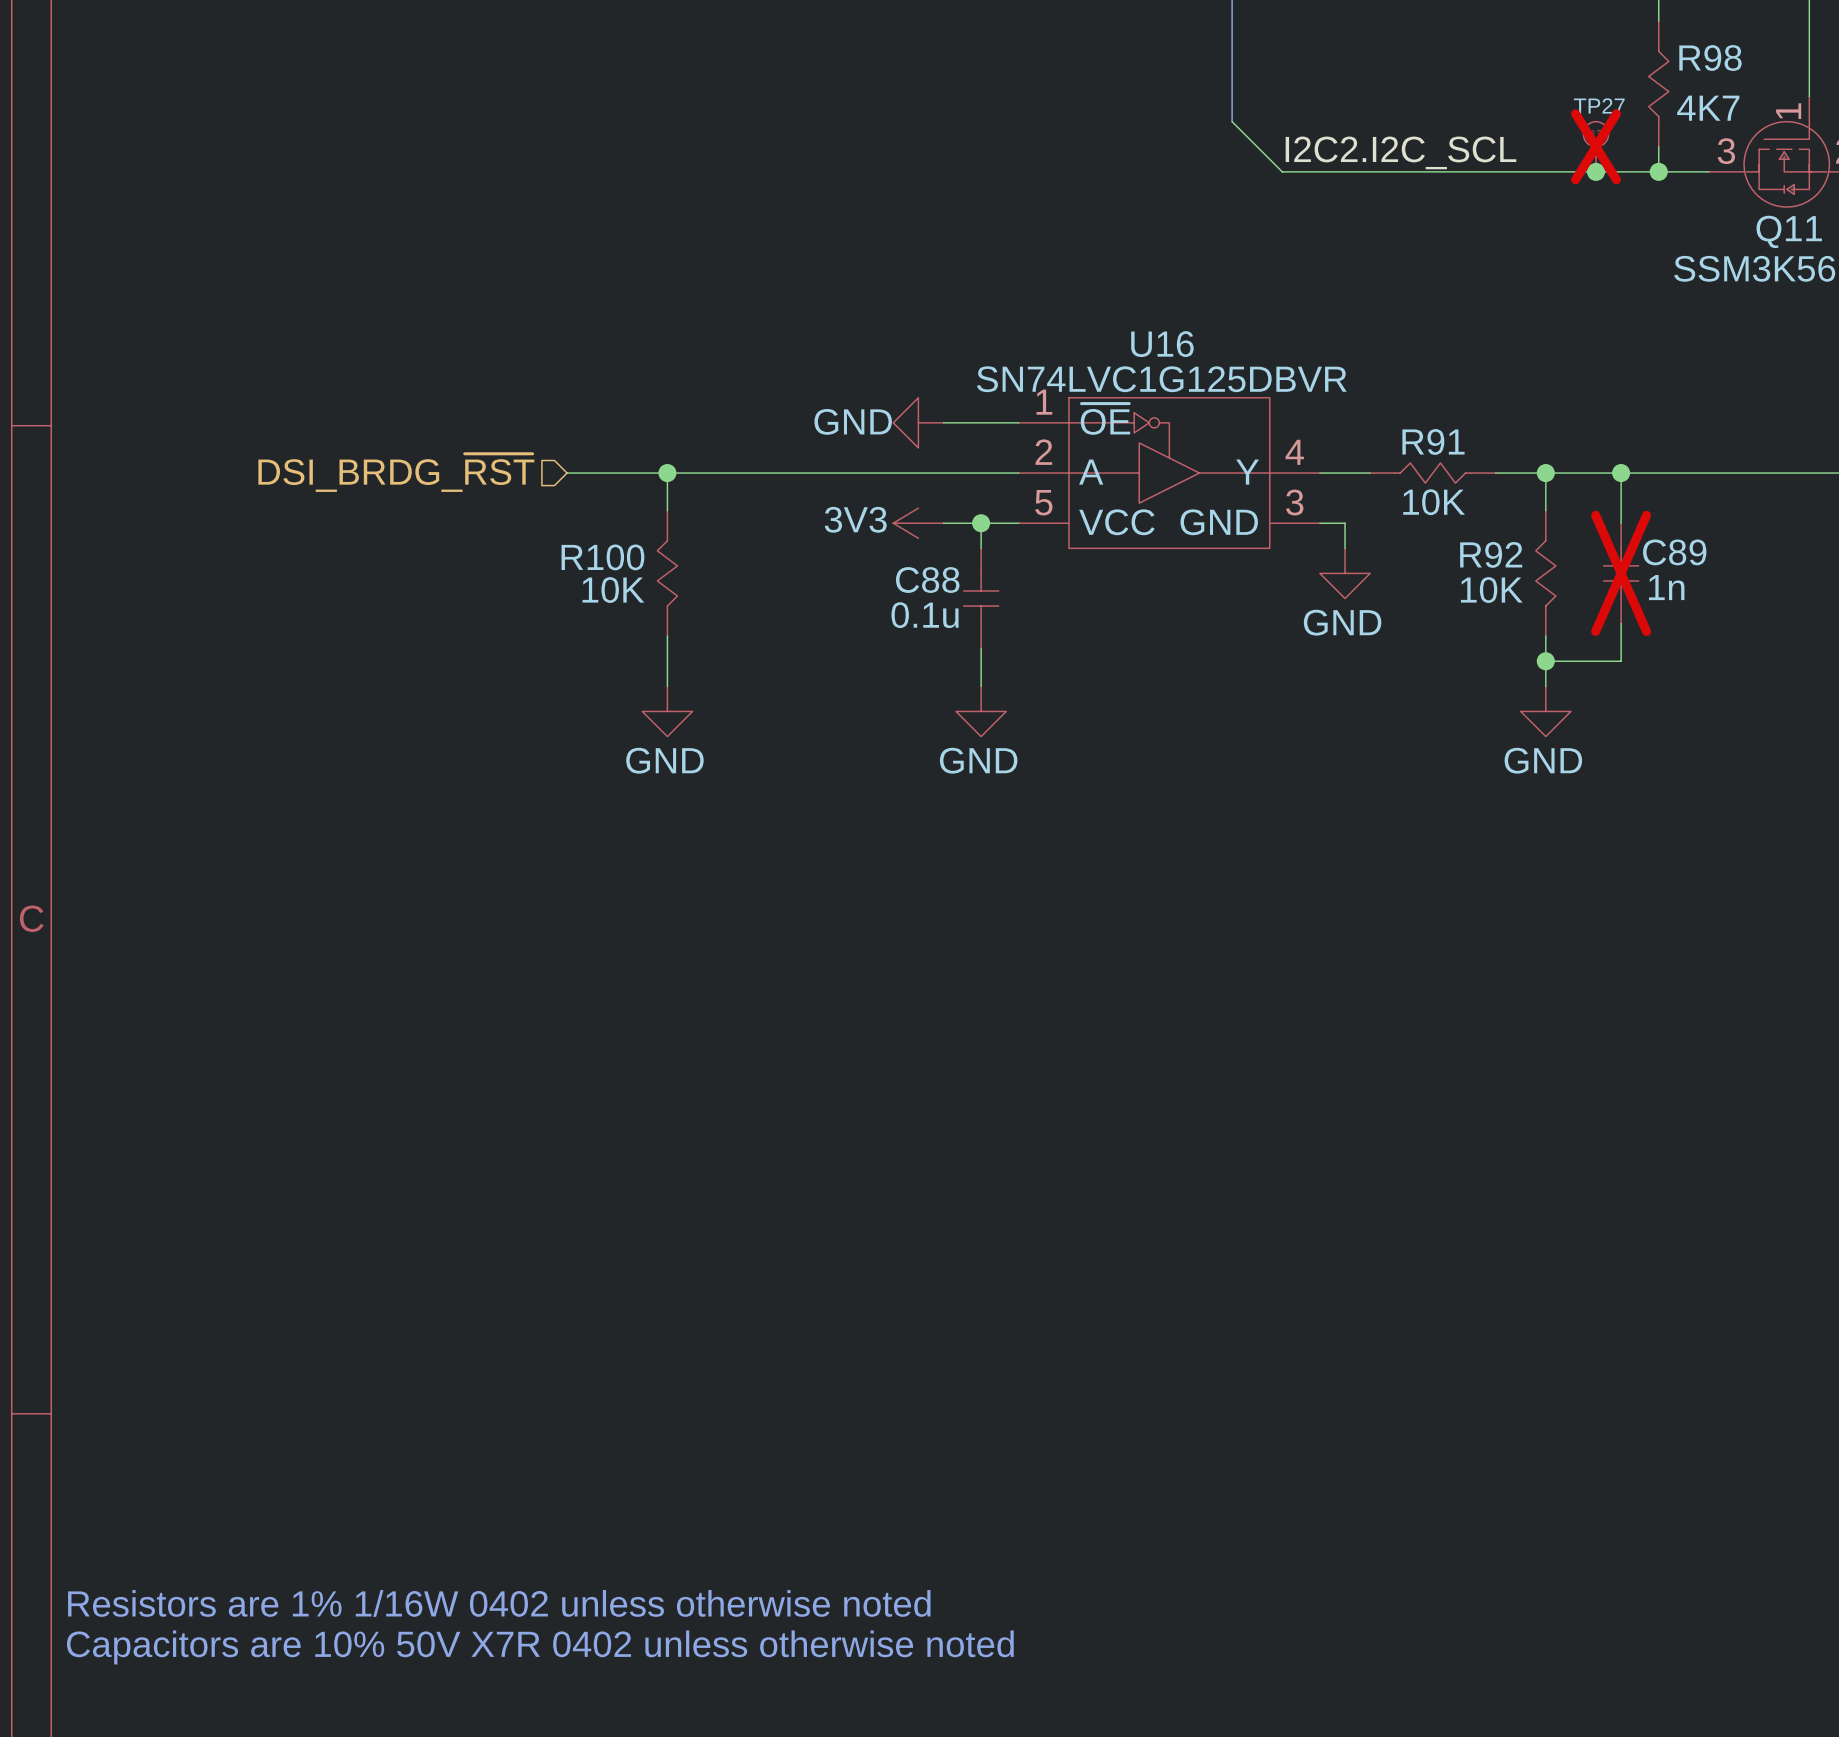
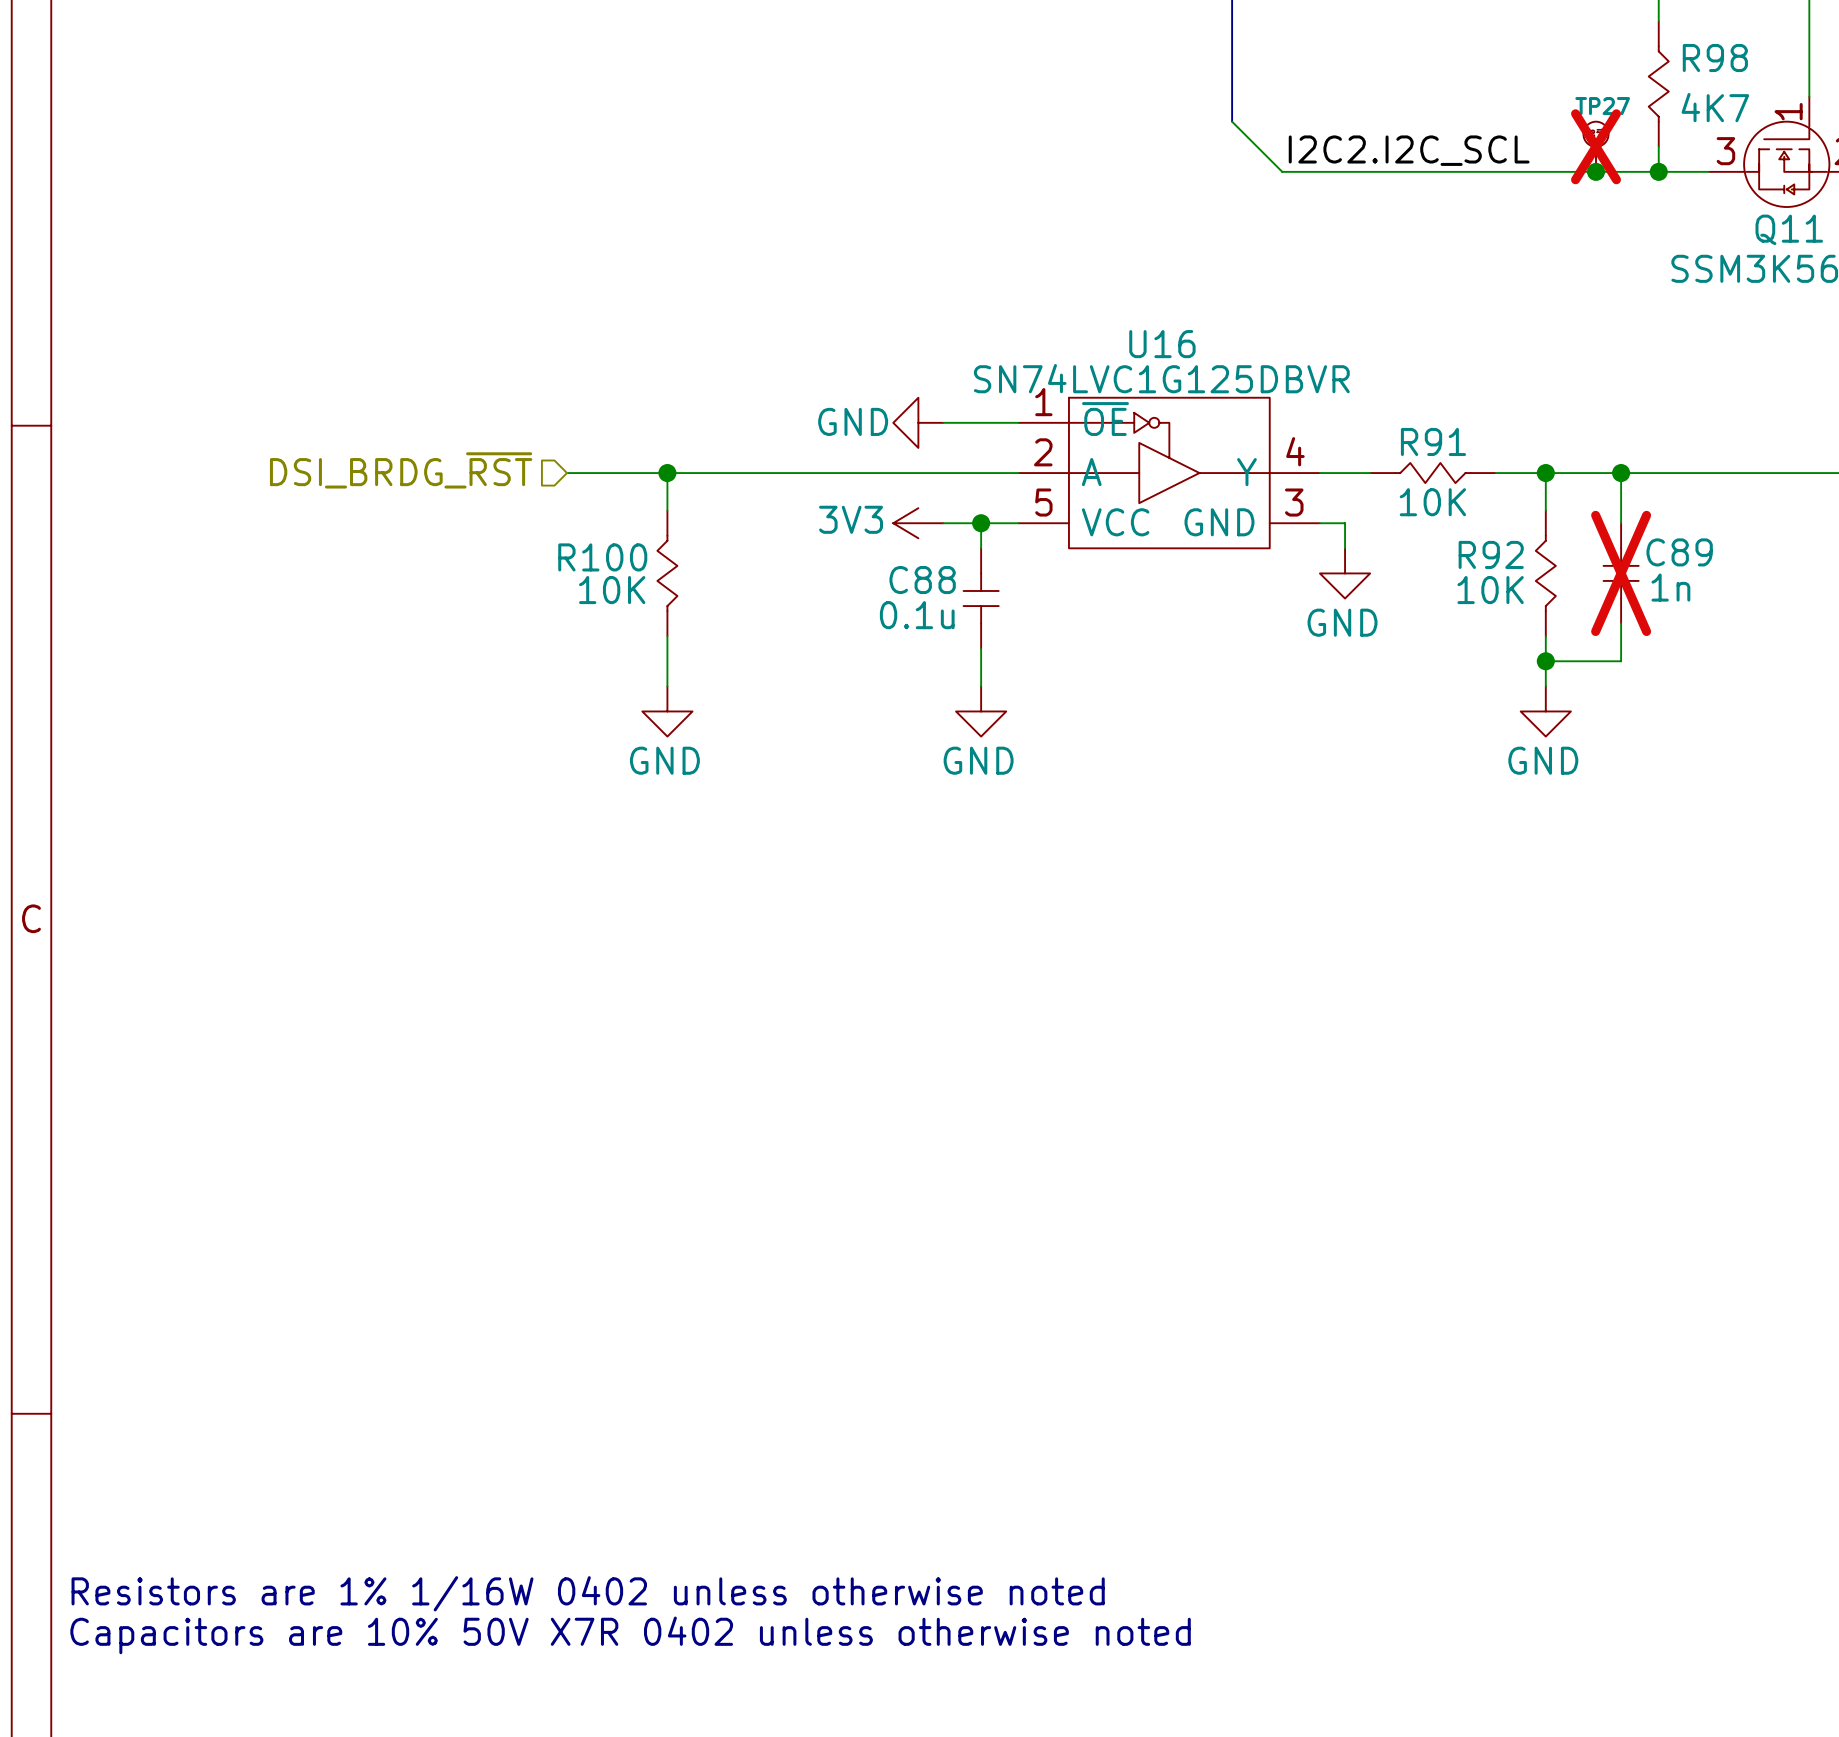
text position: Resistors are 1% 1/16W 0402 unless otherwise noted (499, 1603) -> Resistors are 1% 1/16W 0402 unless otherwise noted (588, 1593)
text position: Capacitors are 10% 50V X7R 0402 unless otherwise noted (540, 1647) -> Capacitors are 10% 50V X7R 0402 unless otherwise noted (630, 1635)

